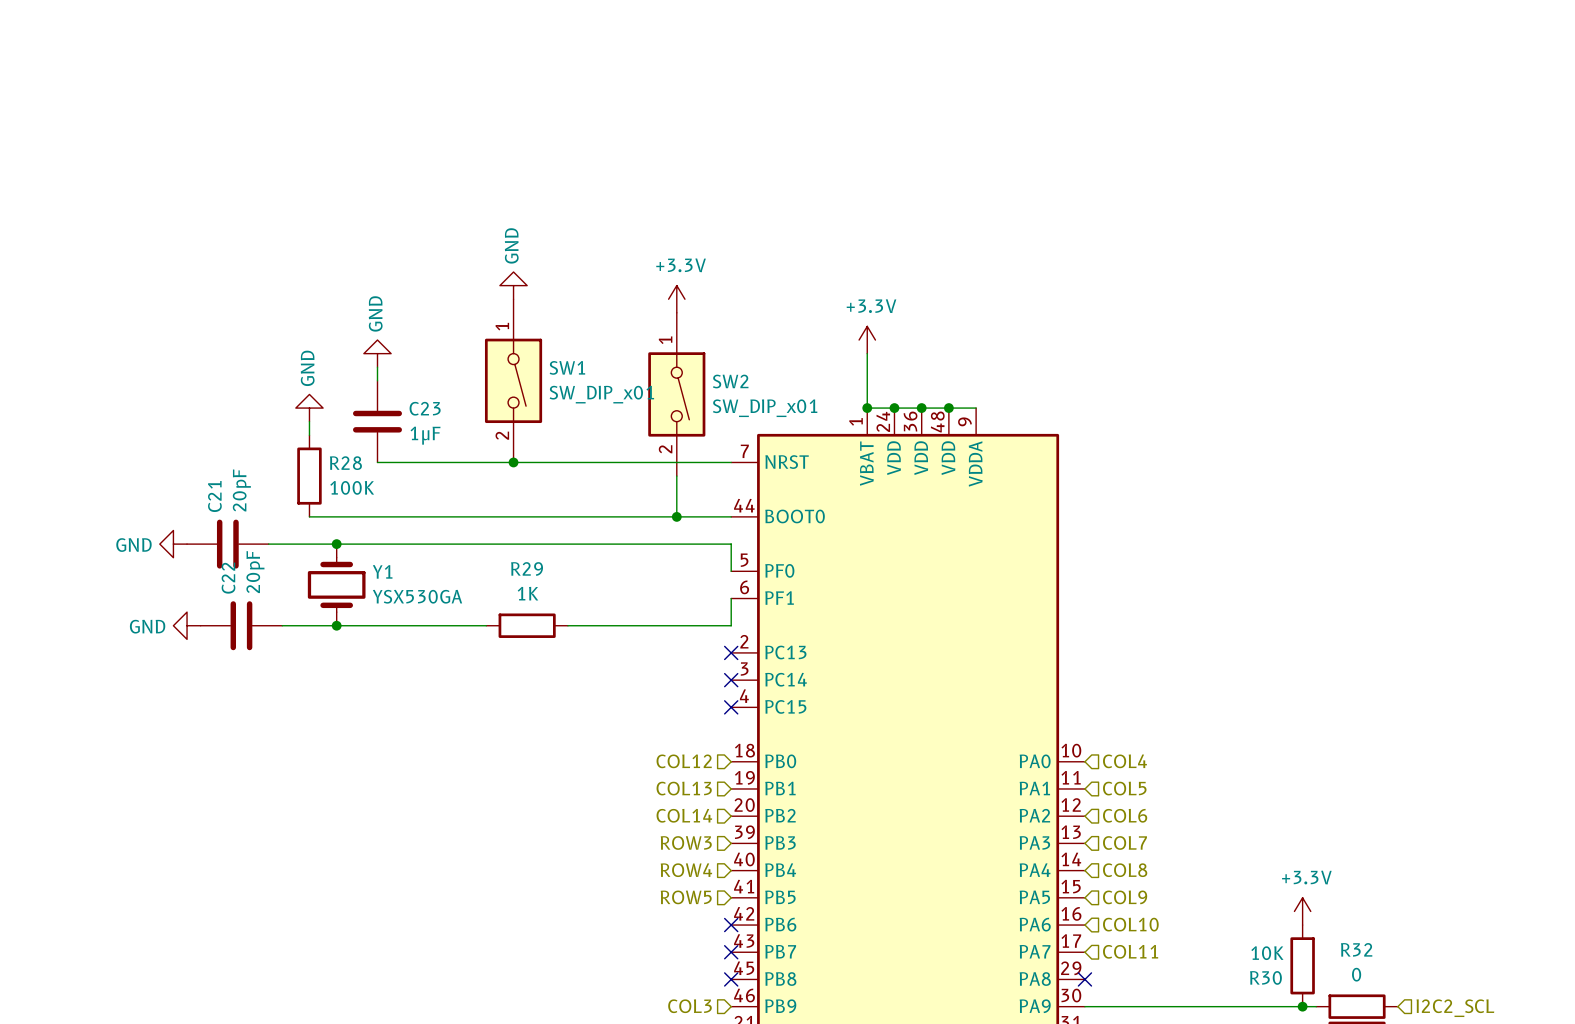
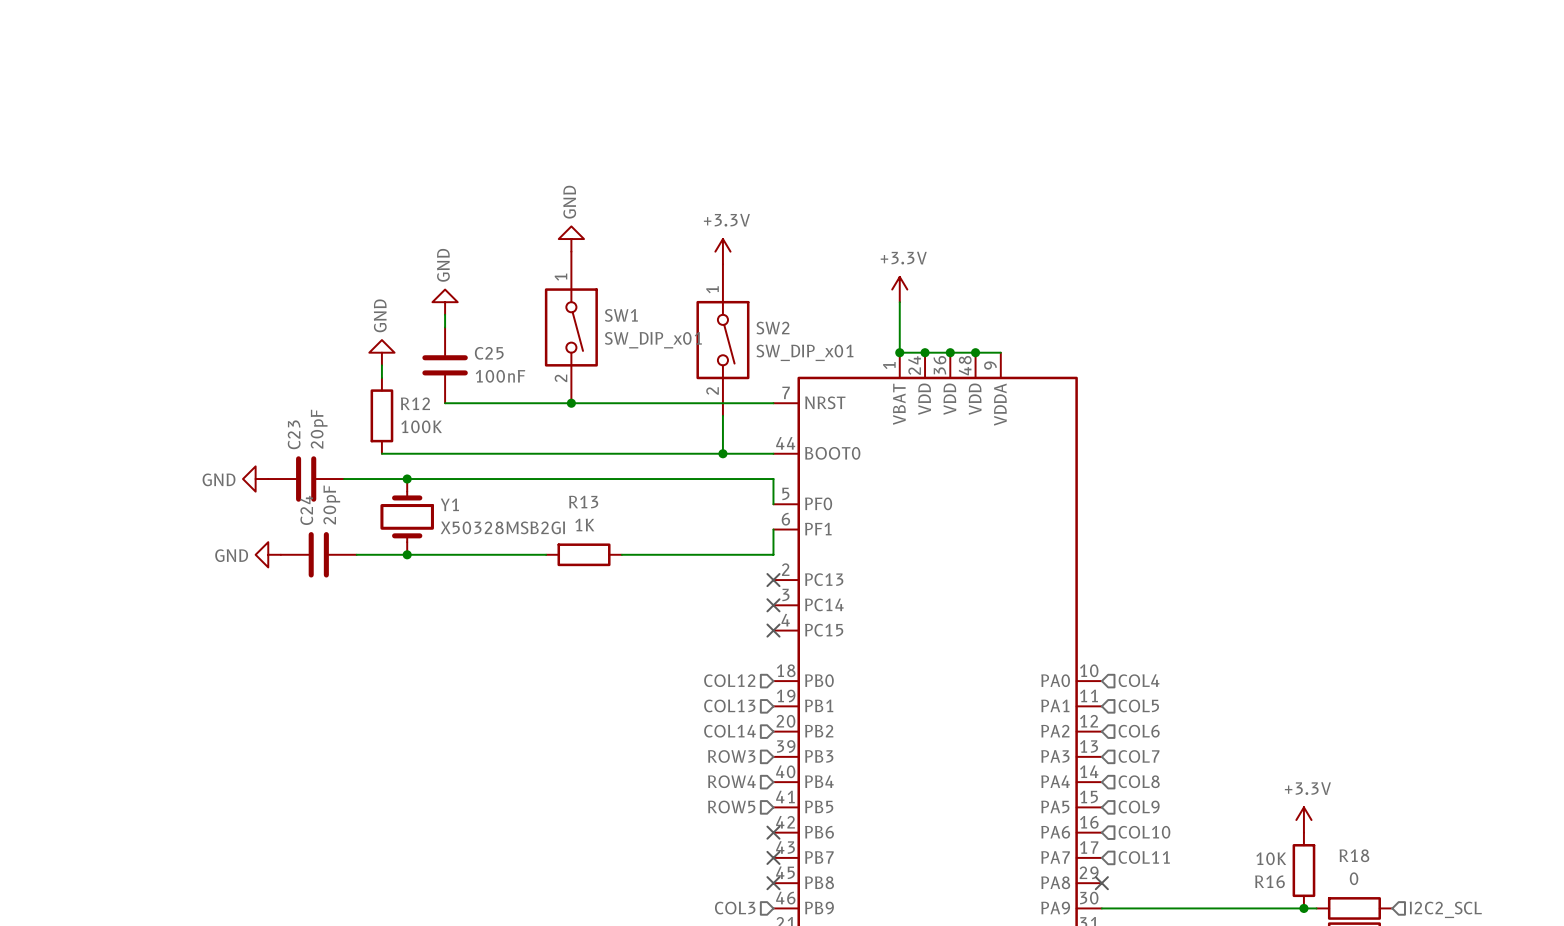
C23 name: C23 (425, 408) -> C25 (489, 353)
C23 value: 1μF (425, 435) -> 100nF (500, 376)
R28 name: R28 (345, 463) -> R12 (415, 403)
C21 name: C21 (214, 496) -> C23 (294, 434)
R29 name: R29 (527, 568) -> R13 (583, 502)
C22 name: C22 (228, 578) -> C24 (306, 510)
Y1 value: YSX530GA (417, 596) -> X50328MSB2GI (502, 527)
R32 name: R32 (1356, 949) -> R18 (1354, 855)
R30 name: R30 (1265, 977) -> R16 (1269, 881)

